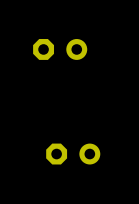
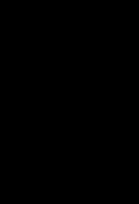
part: (60, 49) -> none
part: (73, 154) -> none

